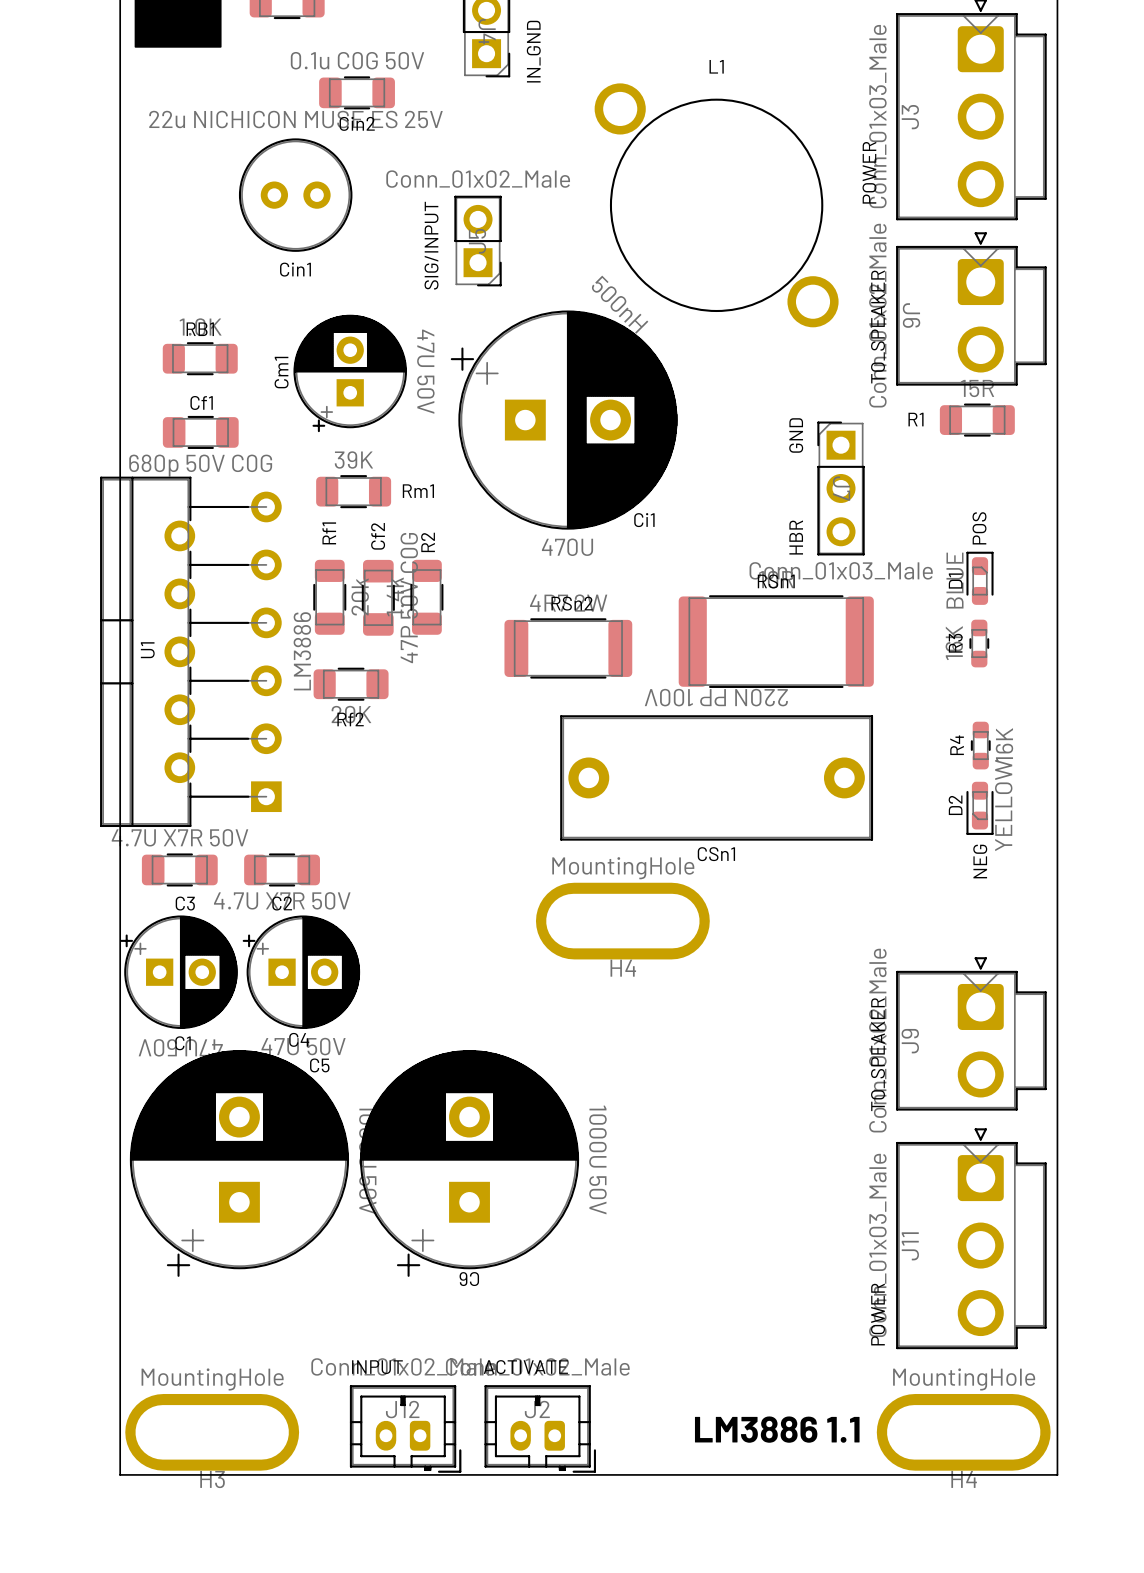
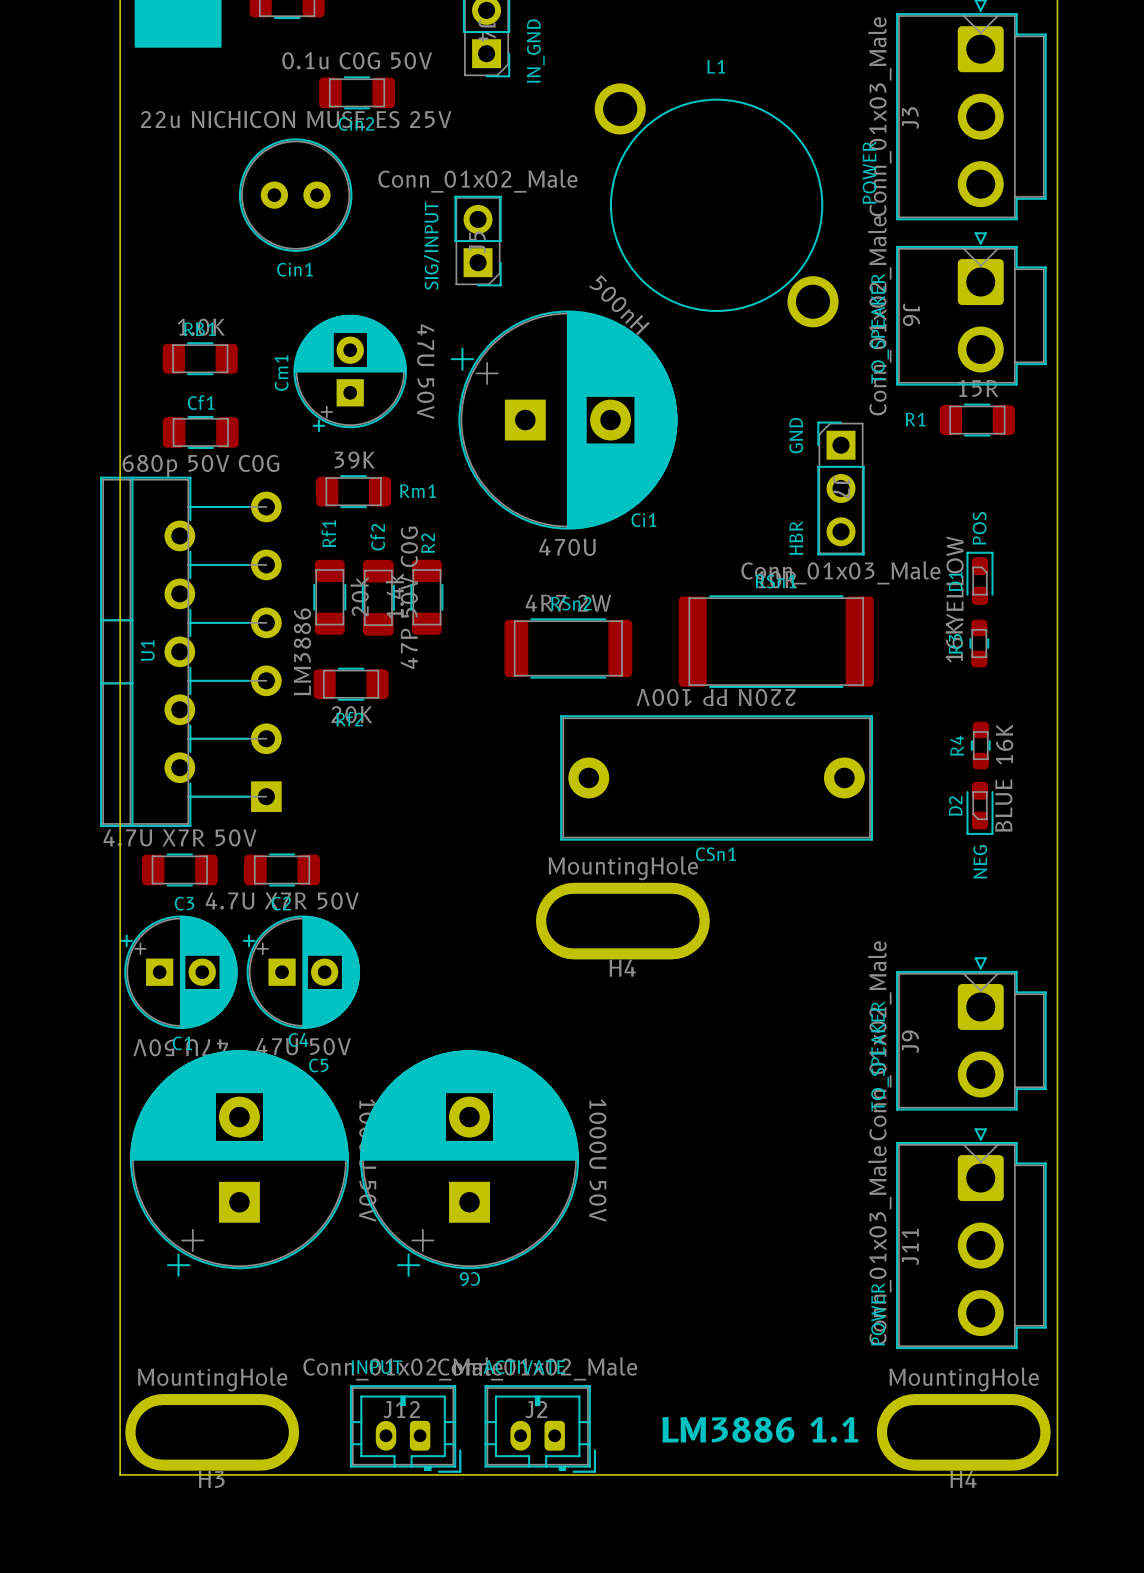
D1 value: BLUE (955, 580) -> YELLOW (955, 581)
D2 value: YELLOW (1003, 805) -> BLUE (1003, 805)

